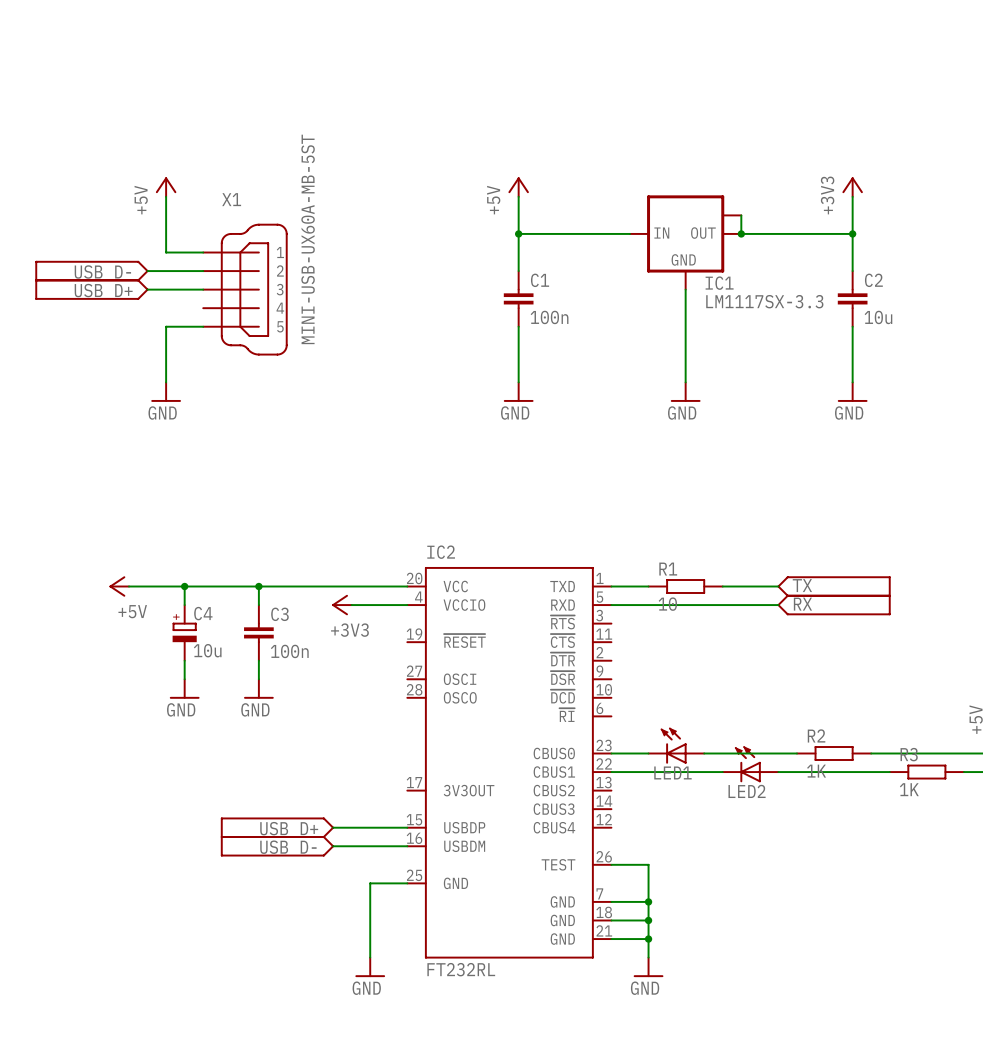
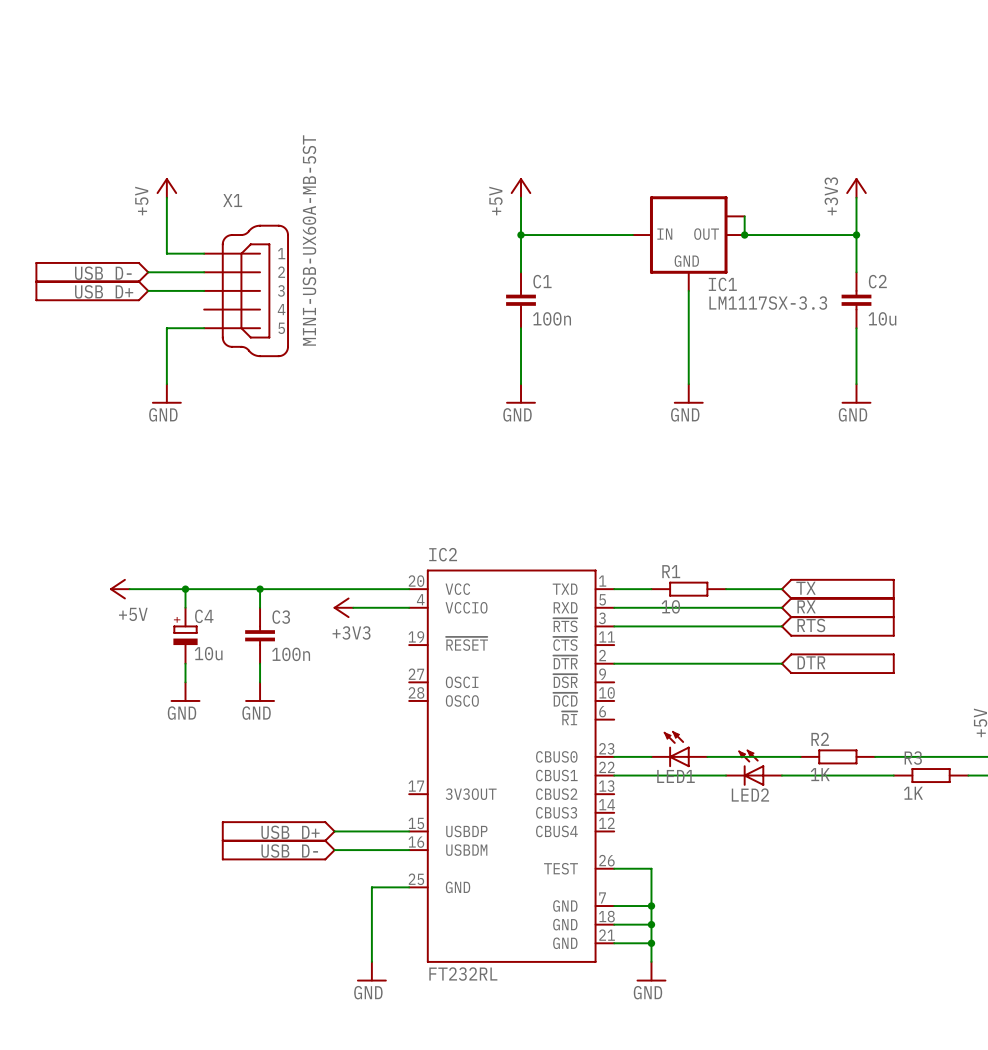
wire: none -> (614, 626) (781, 626)
part: none -> RTS (837, 626)
wire: none -> (614, 663) (781, 663)
part: none -> DTR (837, 663)

